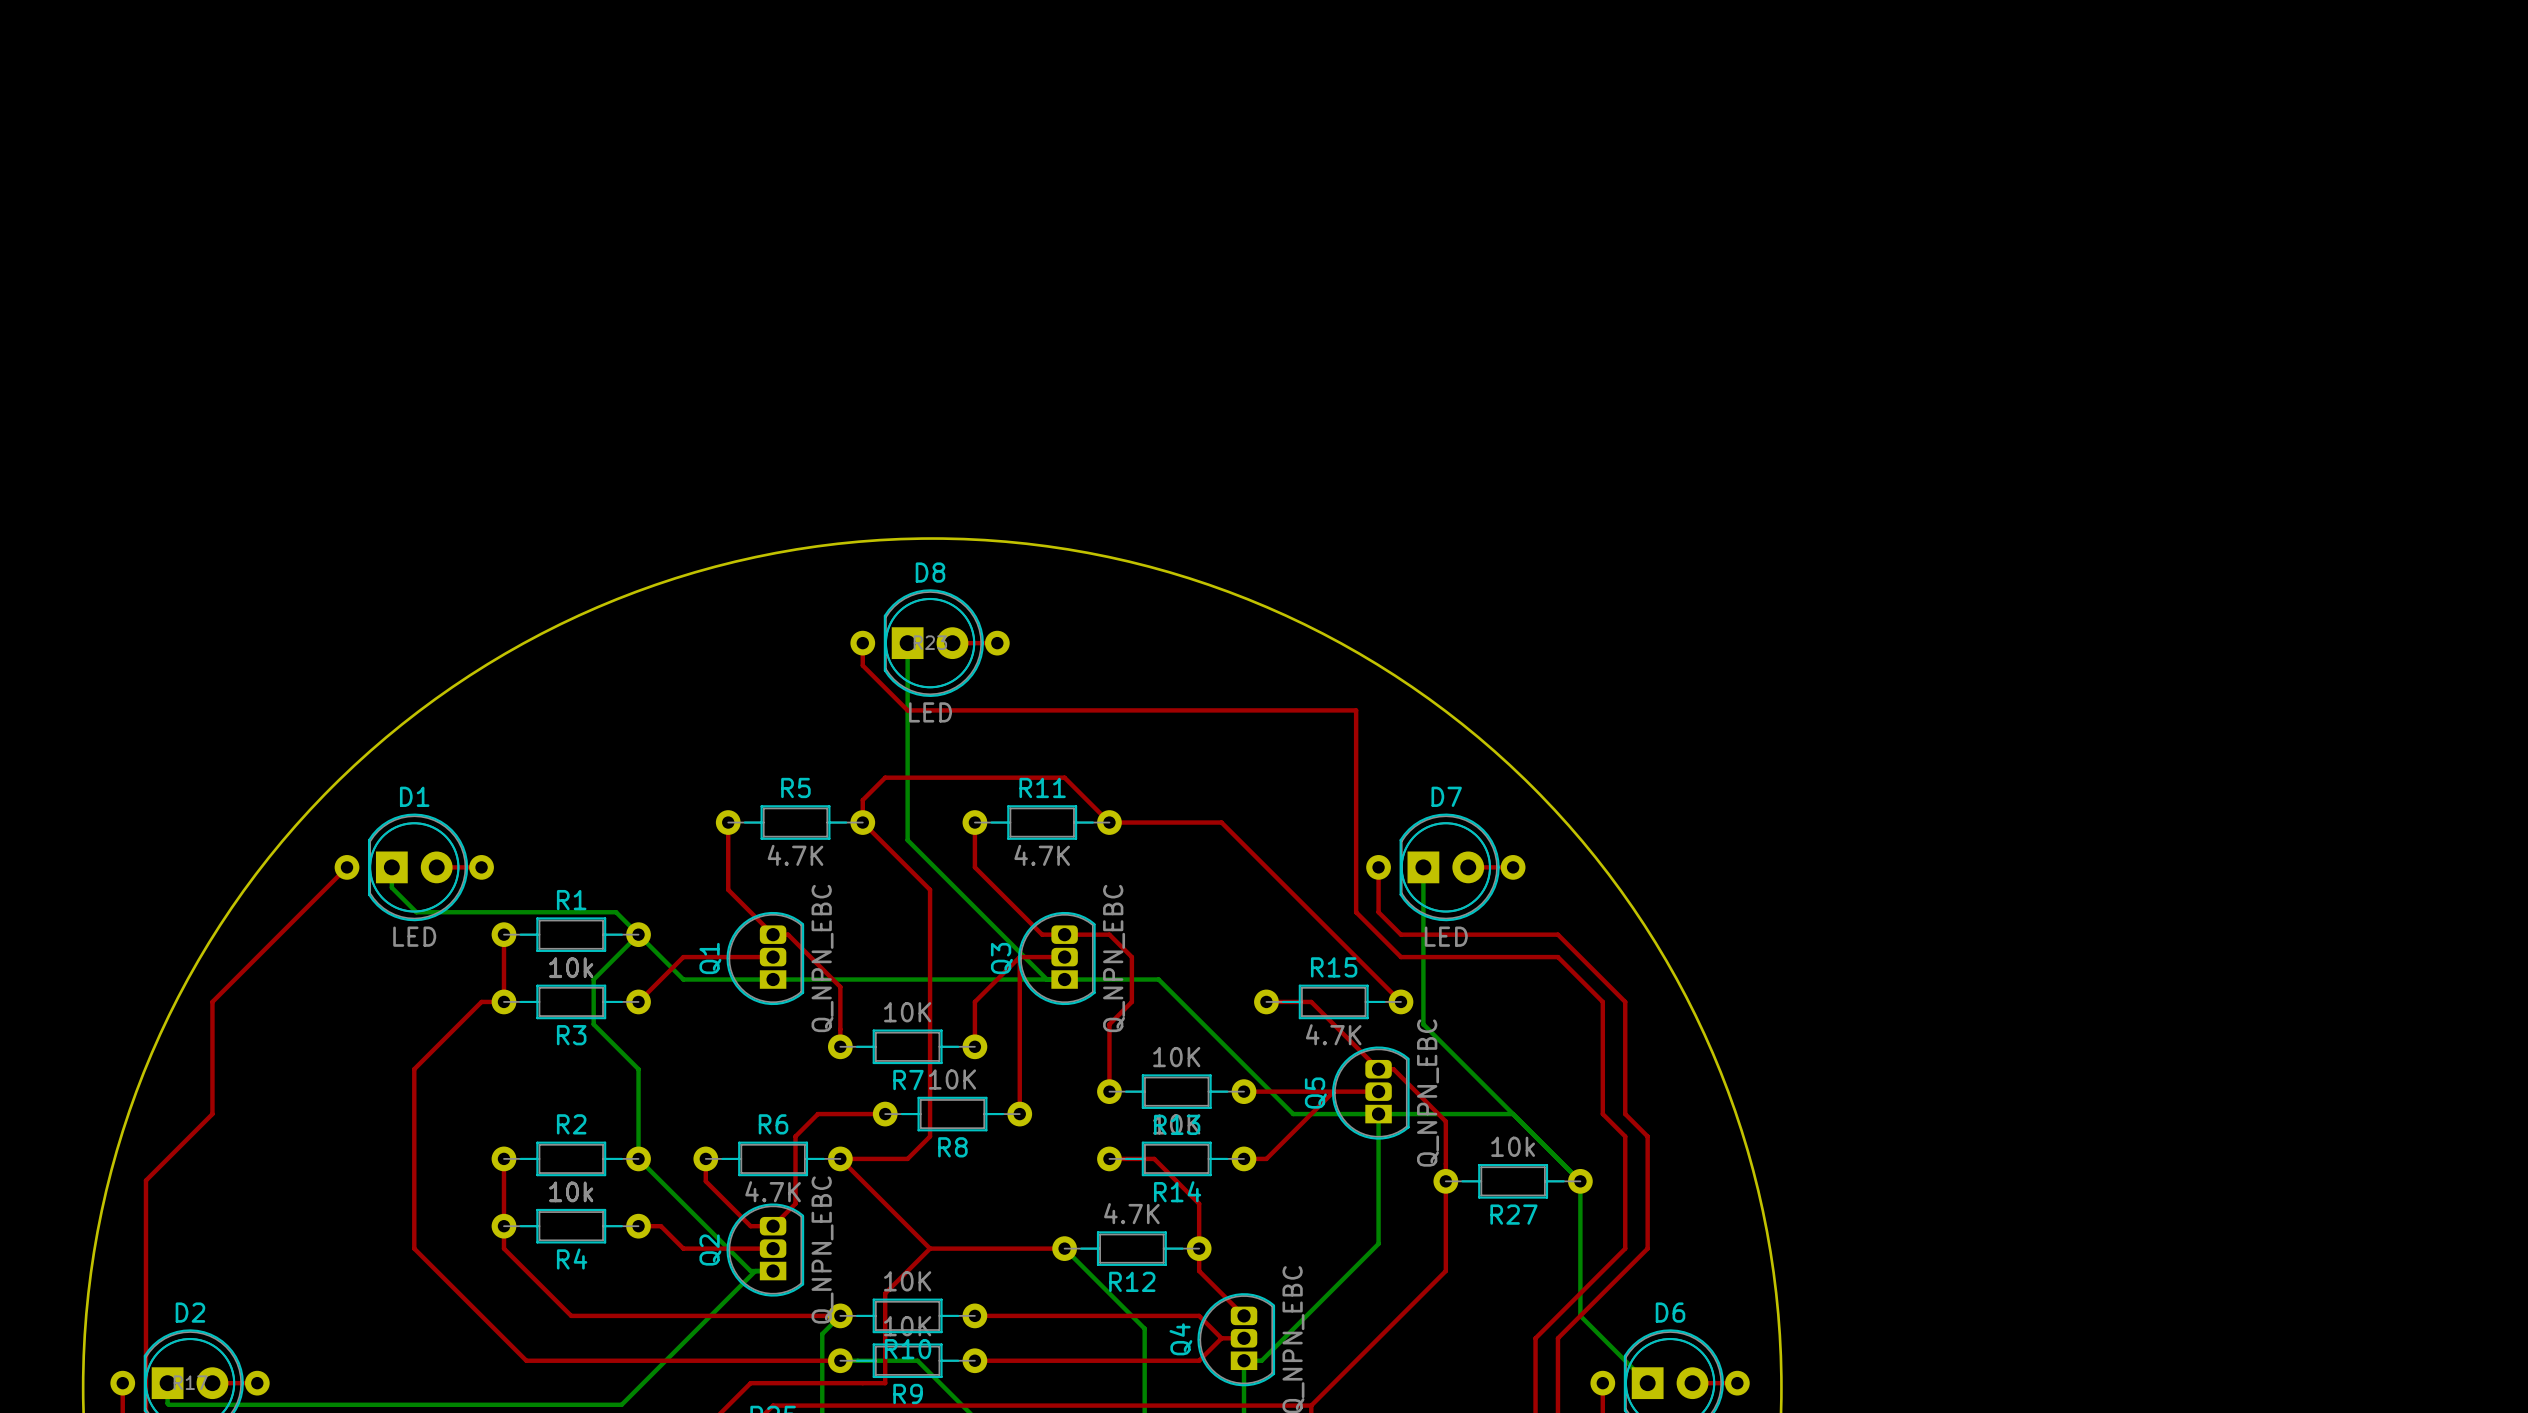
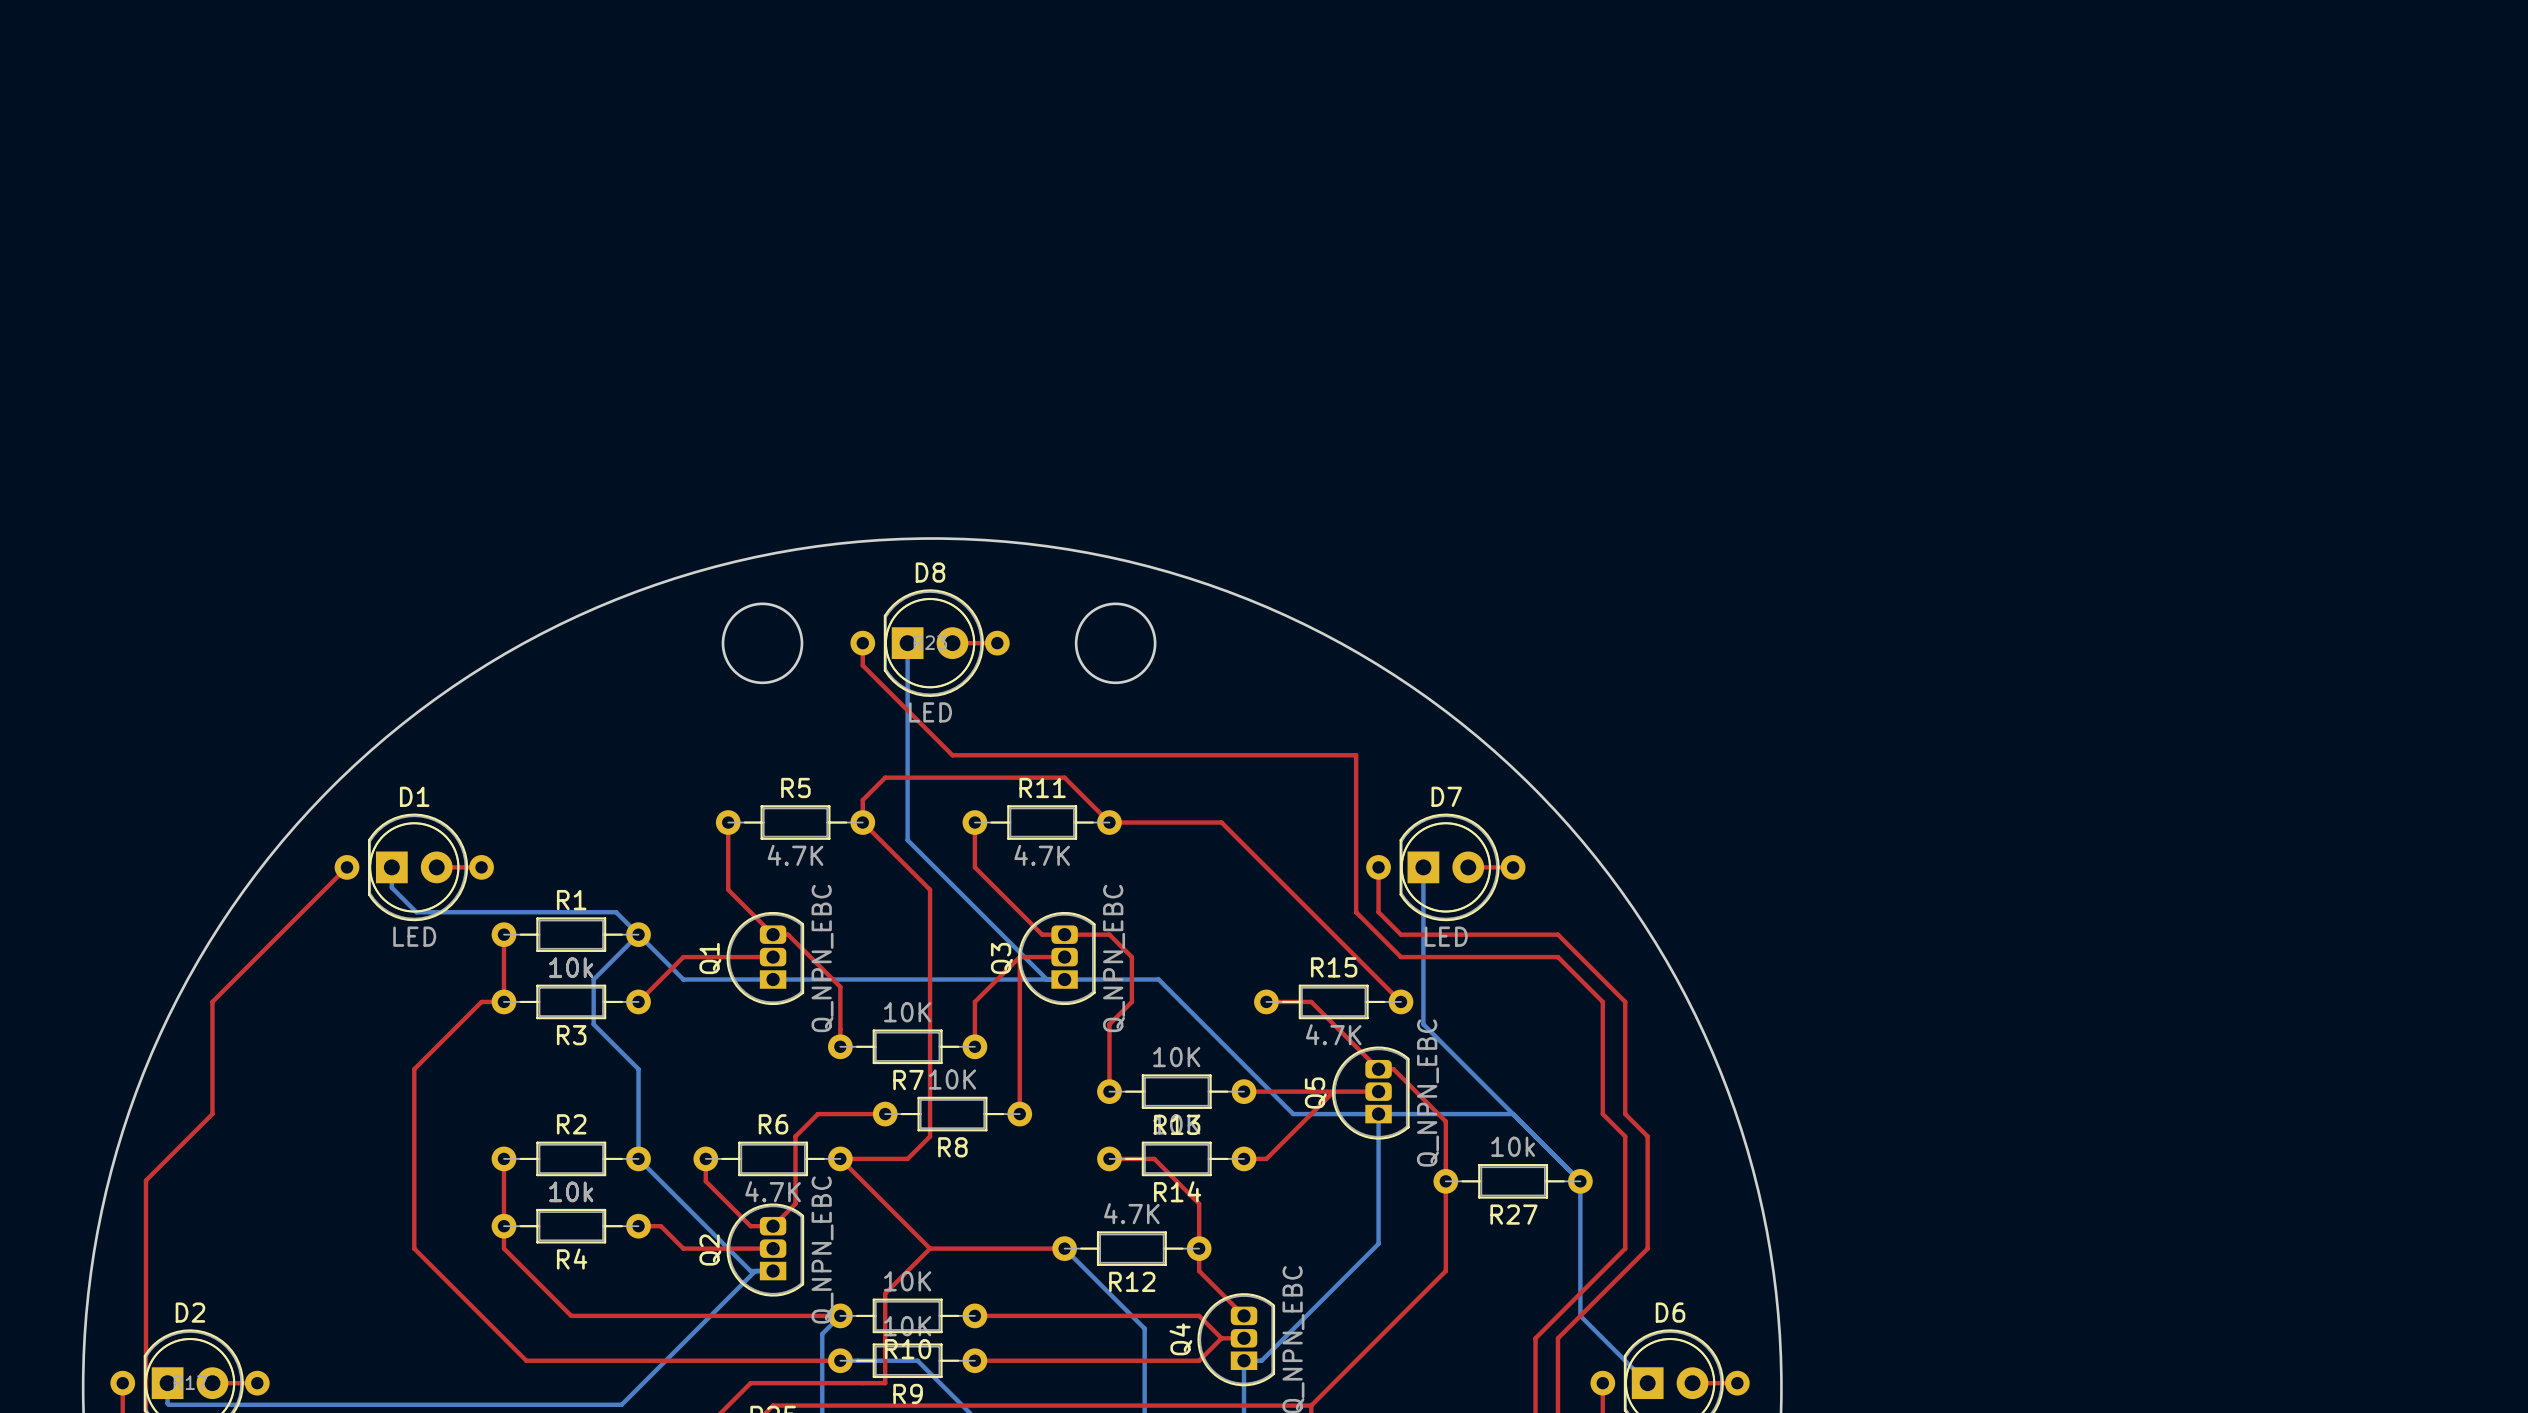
round board edge: none -> [721, 602, 804, 685]
round board edge: none -> [1074, 602, 1157, 685]
top track: (907, 710) (1356, 710) (1356, 755) -> (907, 710) (952, 755) (1356, 755)

